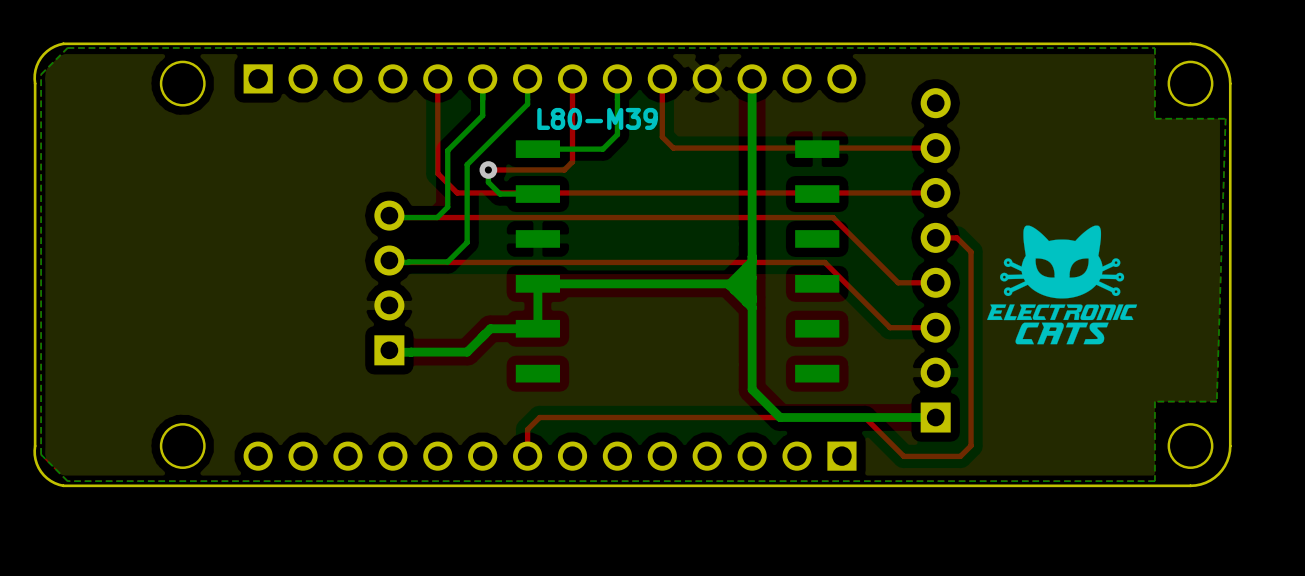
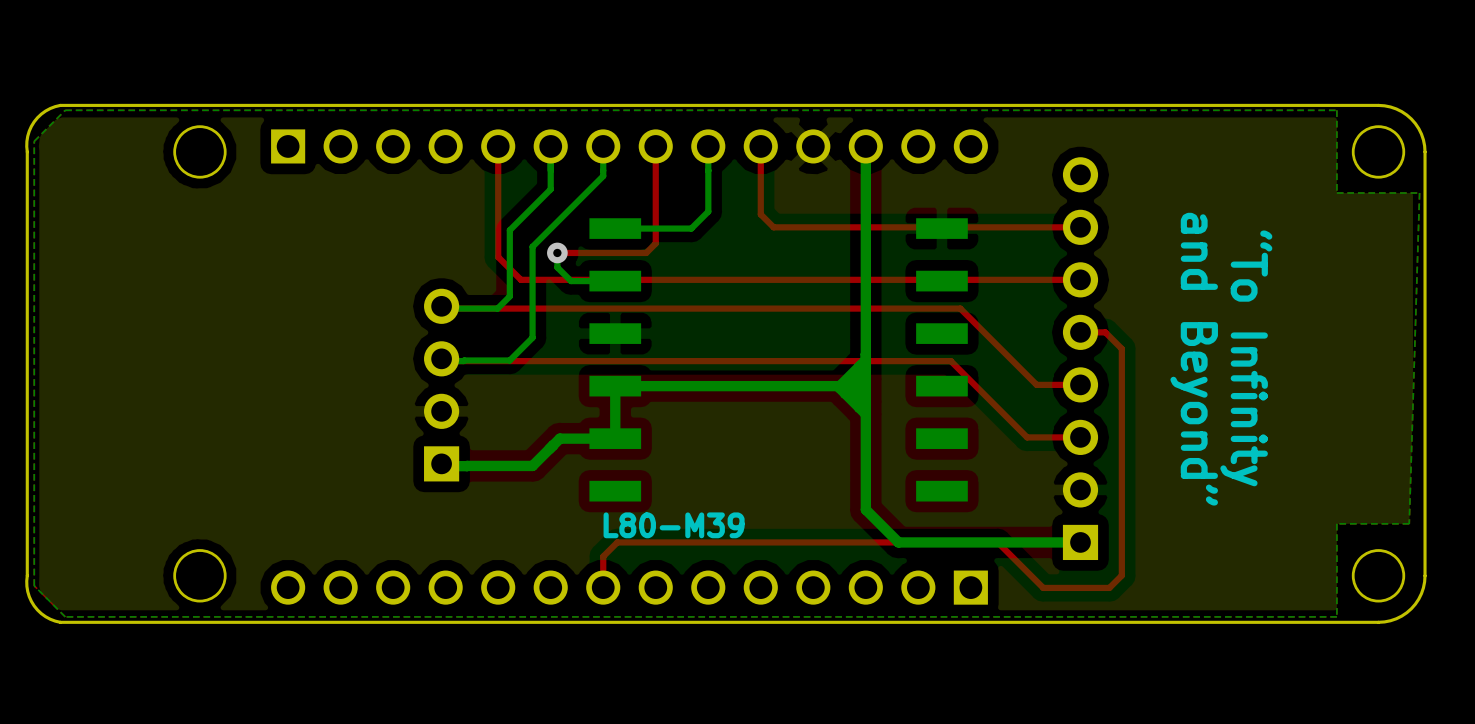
part value position: L80-M39 (597, 118) -> L80-M39 (674, 525)
drawing: [987, 225, 1138, 345] -> none
text: none -> and Beyond” (1194, 359)
text: none -> “To Infinity (1246, 358)

